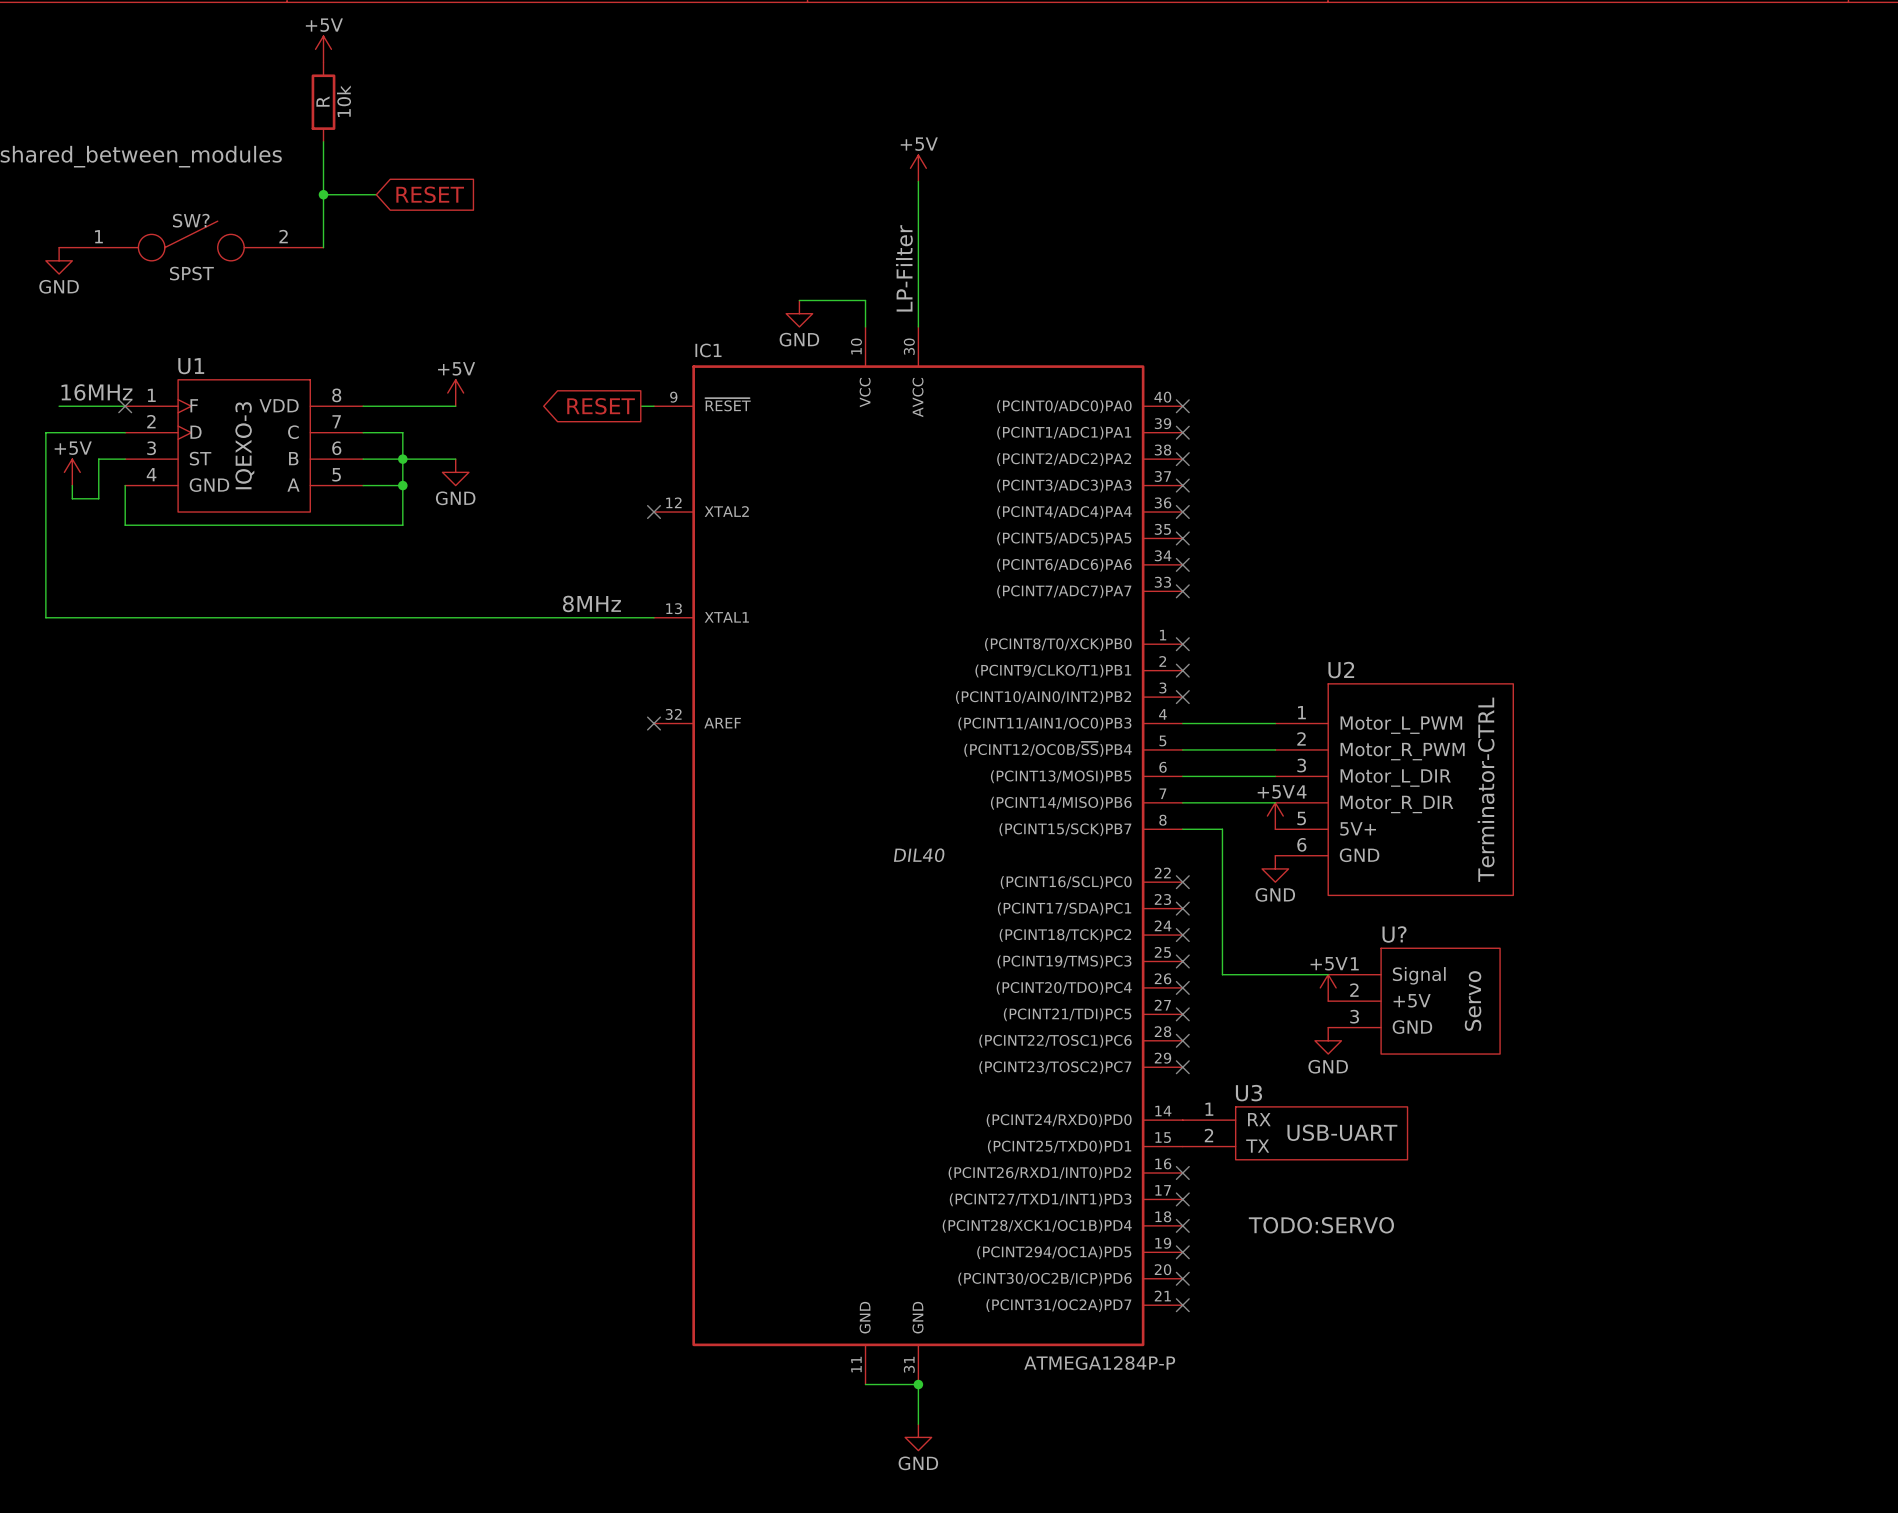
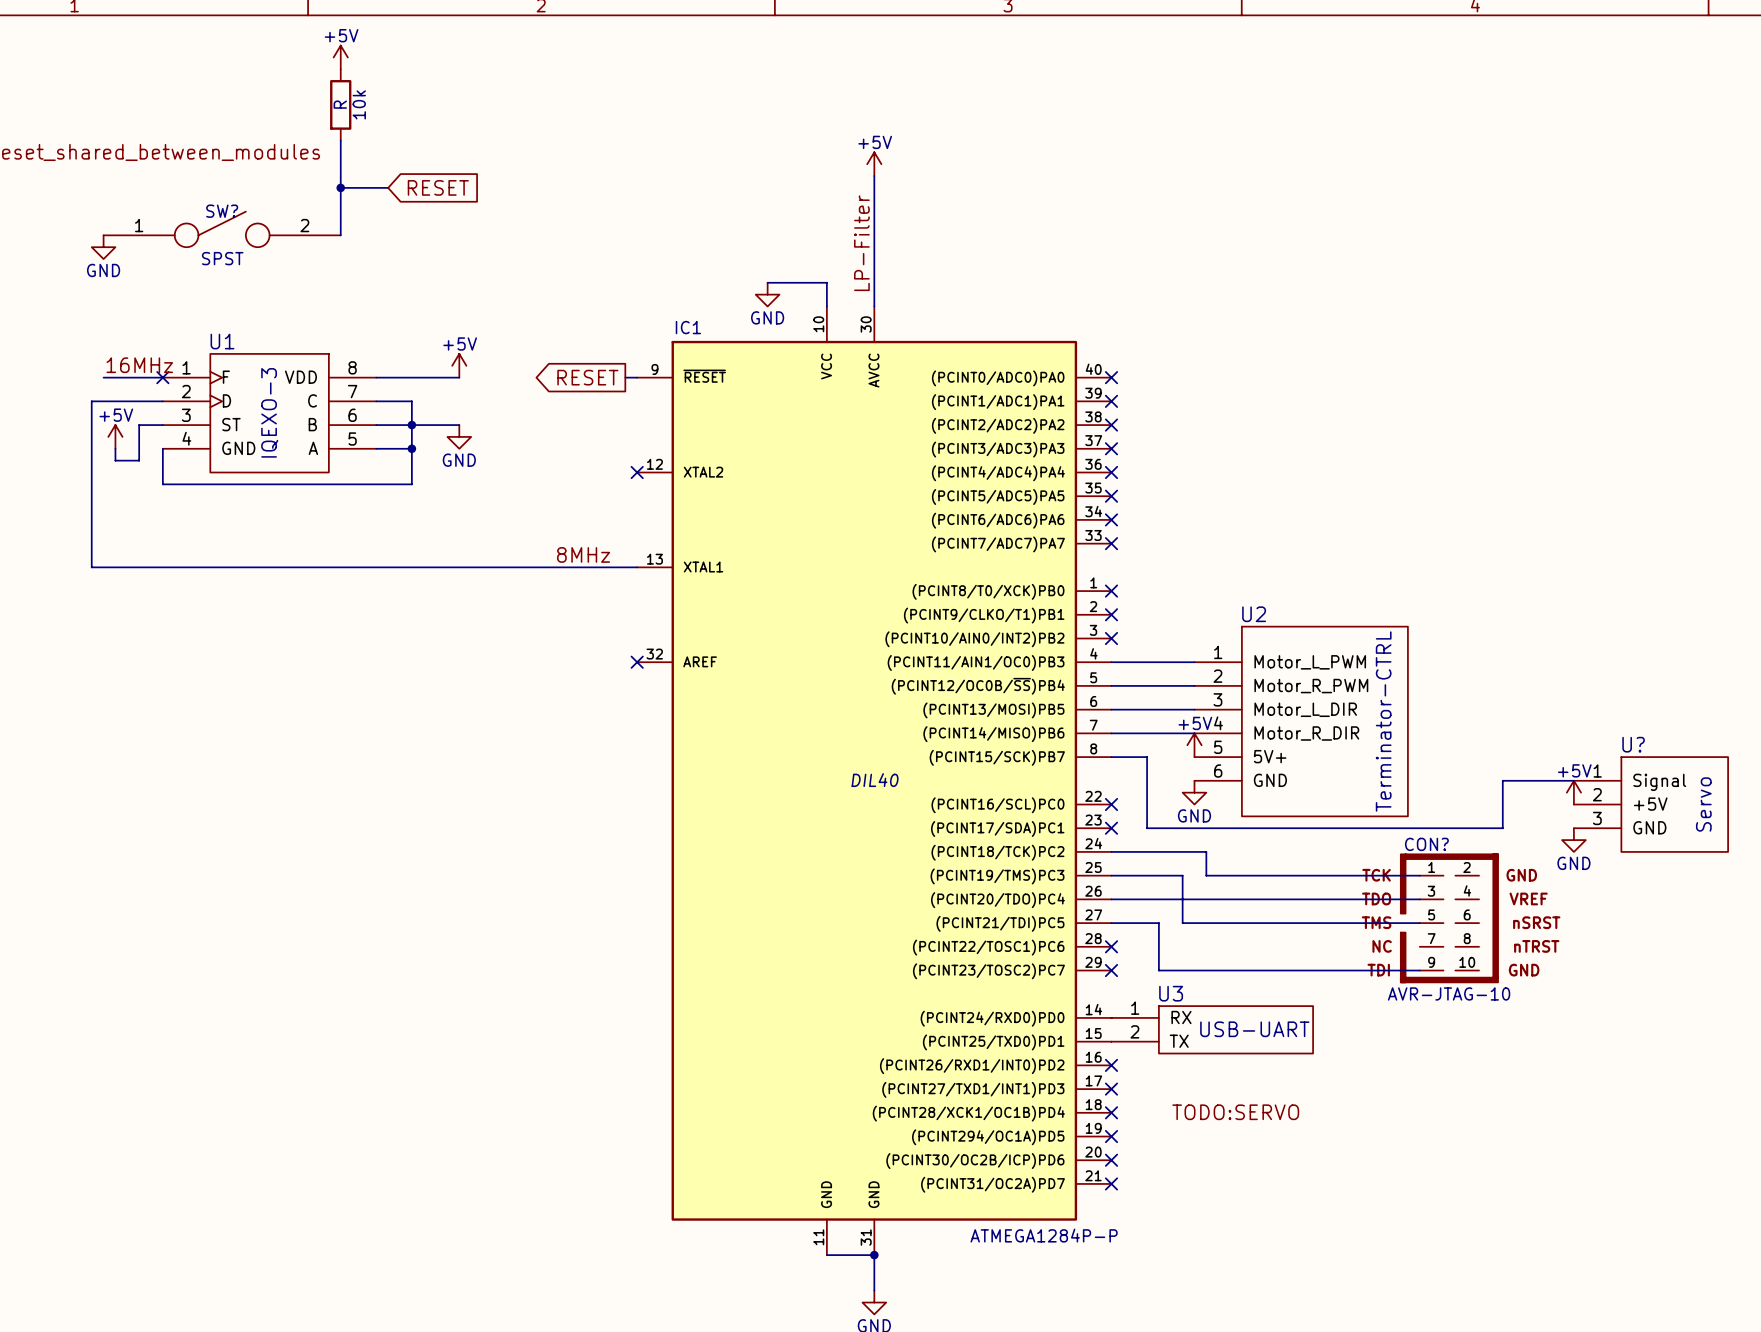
power symbol: none -> +5V (1573, 792)
U?: none -> Servo (1651, 804)
wire: (1222, 908) (1222, 974) (1328, 974) -> (1147, 828) (1502, 828) (1502, 780) (1573, 780)
power symbol: none -> GND (1573, 840)
wire: none -> (1111, 851) (1206, 851) (1206, 875) (1419, 875)
no-connect mark: (1182, 935) -> none
wire: none -> (1111, 875) (1182, 875) (1182, 923) (1419, 923)
no-connect mark: (1182, 961) -> none
wire: none -> (1111, 899) (1419, 899)
no-connect mark: (1182, 987) -> none
power symbol: +5V (1328, 987) -> none
U?: Servo (1414, 1001) -> none
CON?: none -> AVR-JTAG-10 (1449, 918)
wire: none -> (1111, 923) (1158, 923) (1158, 970) (1419, 970)
no-connect mark: (1182, 1014) -> none
power symbol: GND (1328, 1040) -> none

